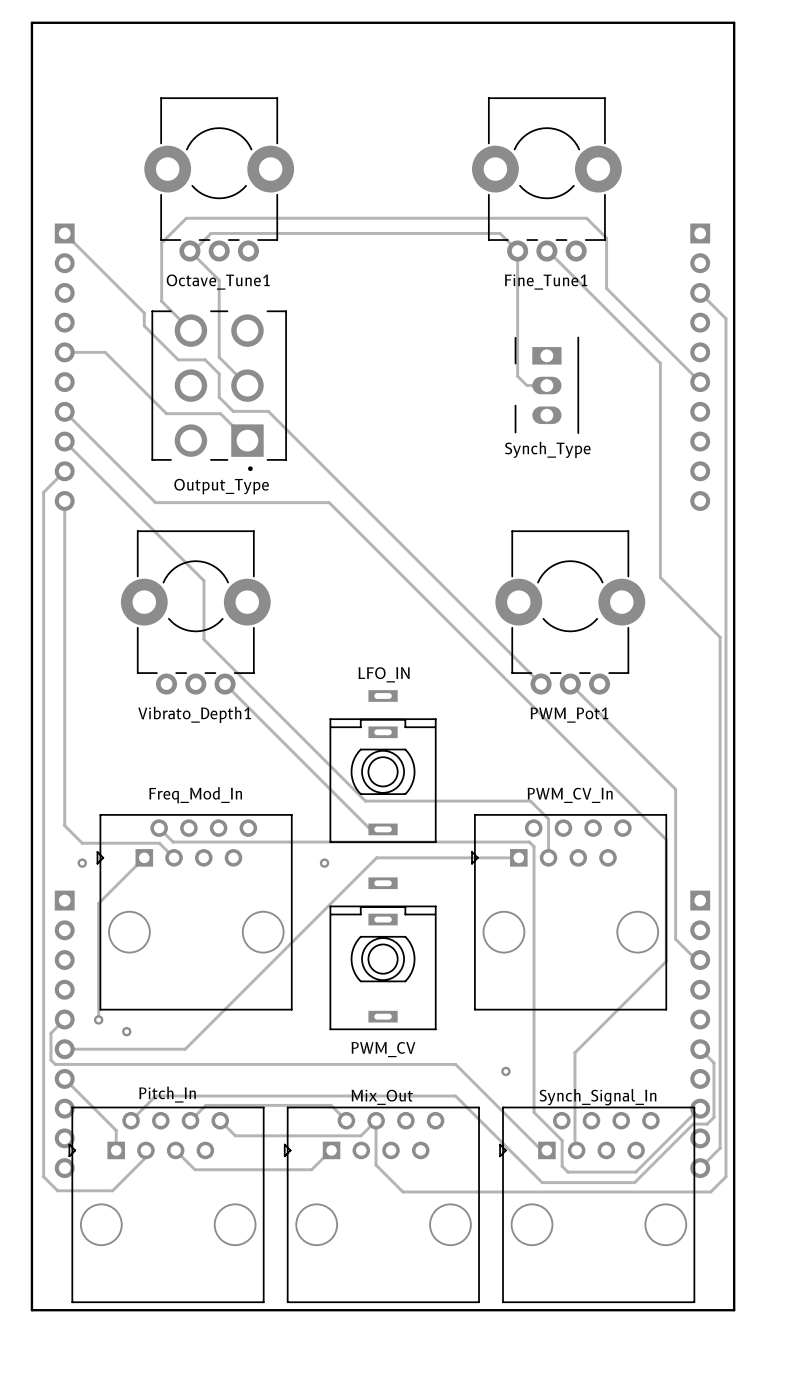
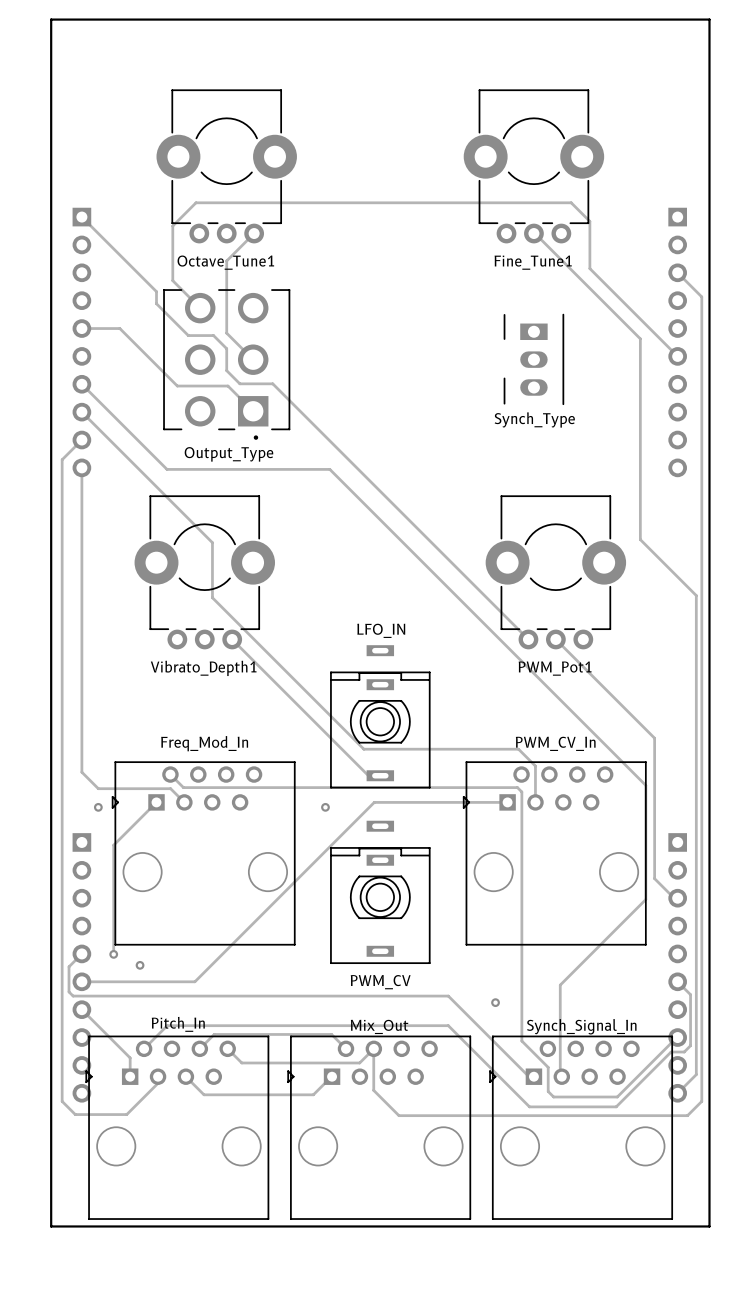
track: (189, 251) (219, 280) -> (254, 233) (226, 260)
track: (187, 256) (211, 233) (500, 233) (517, 251) (517, 376) (526, 385) (546, 385) -> none

